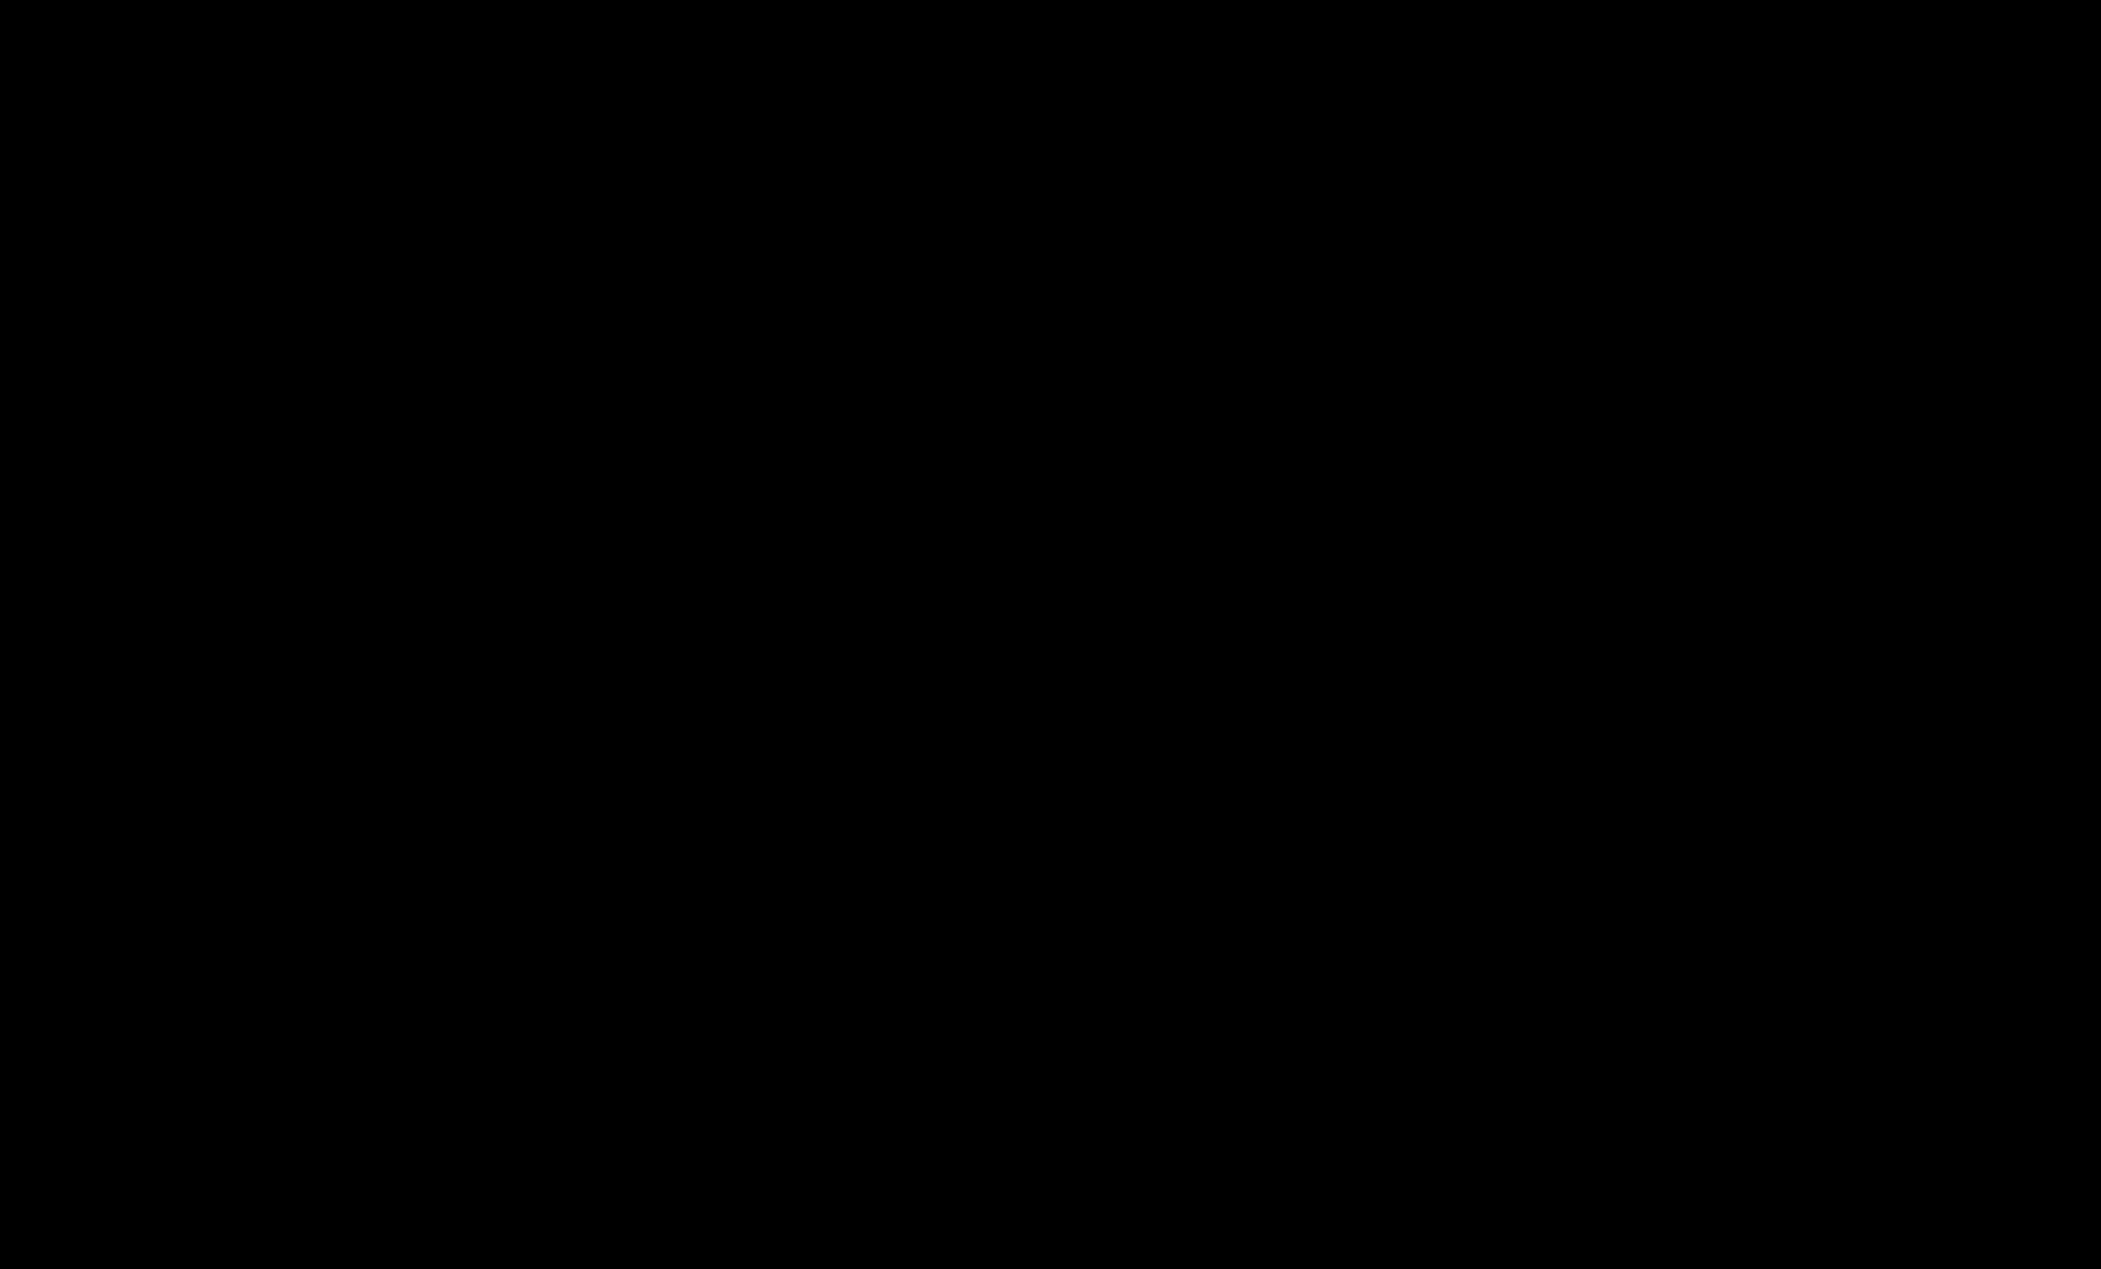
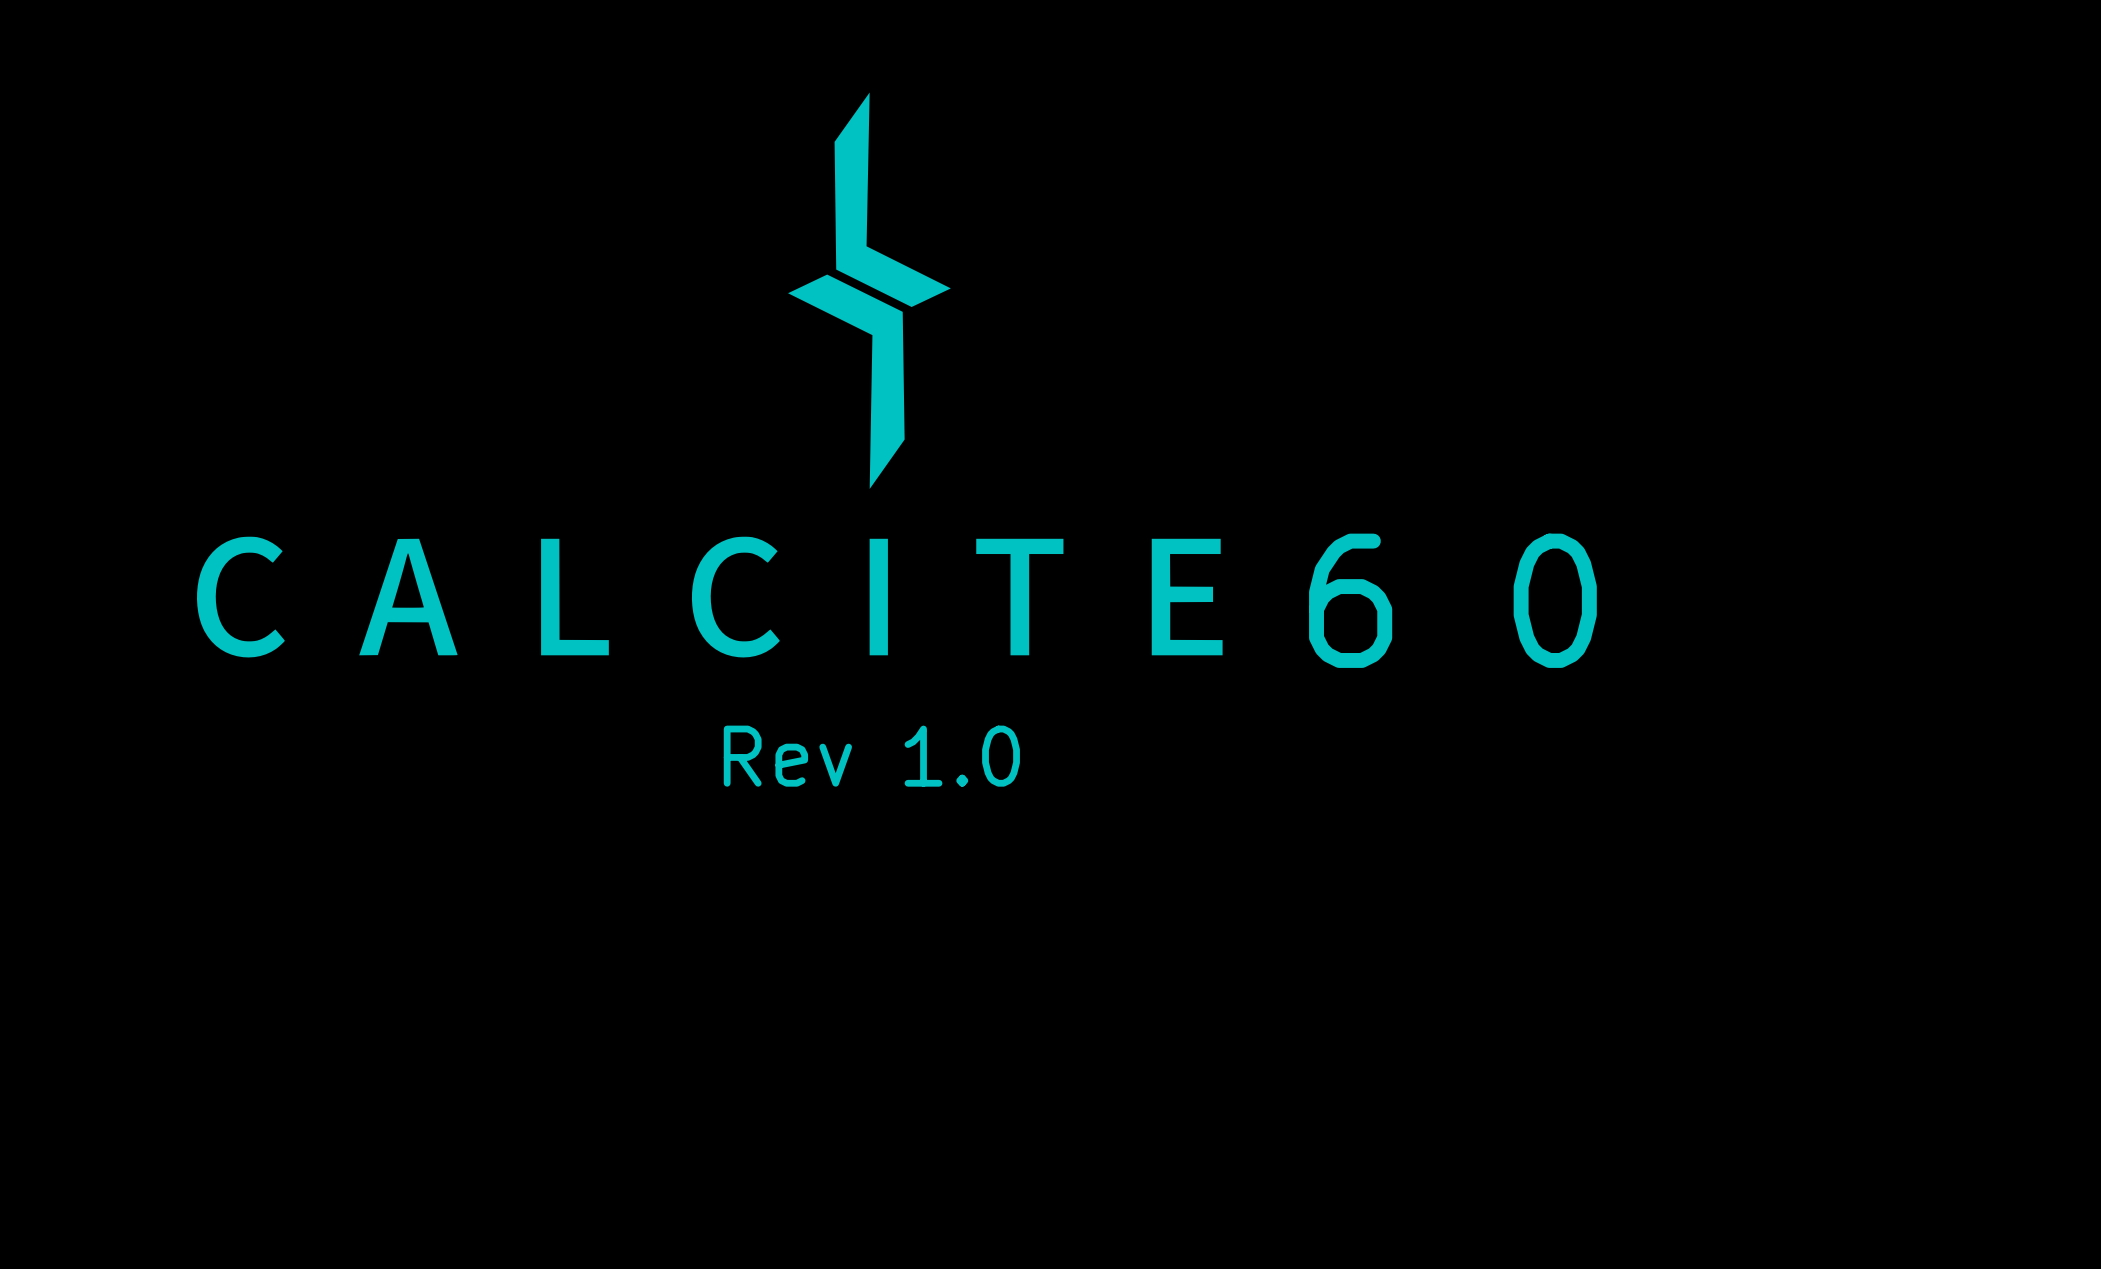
drawing: none -> [788, 92, 951, 489]
drawing: none -> [196, 536, 1223, 658]
text: none -> 6 0 (1452, 600)
text: none -> Rev 1.0 (871, 756)

